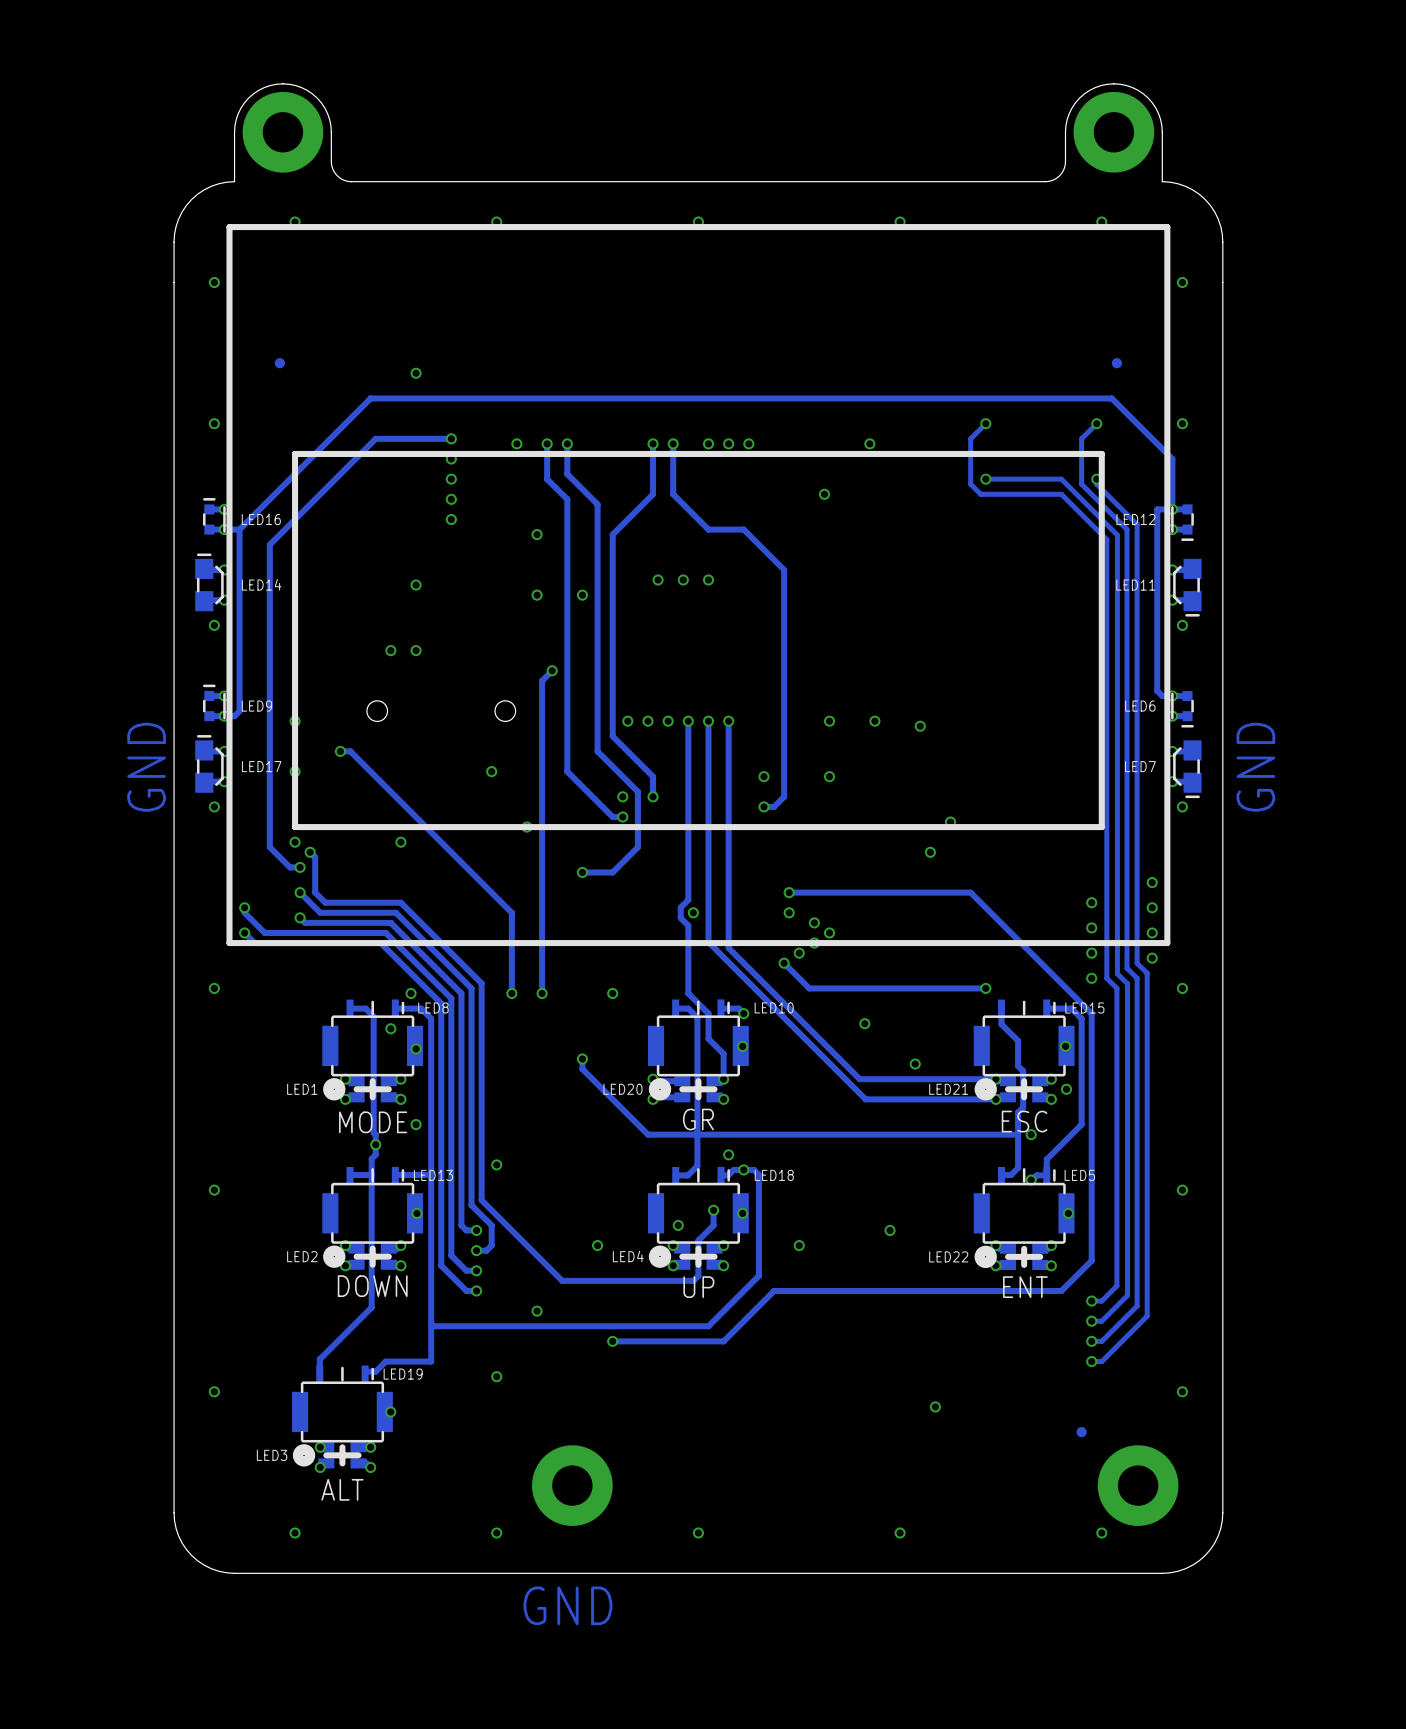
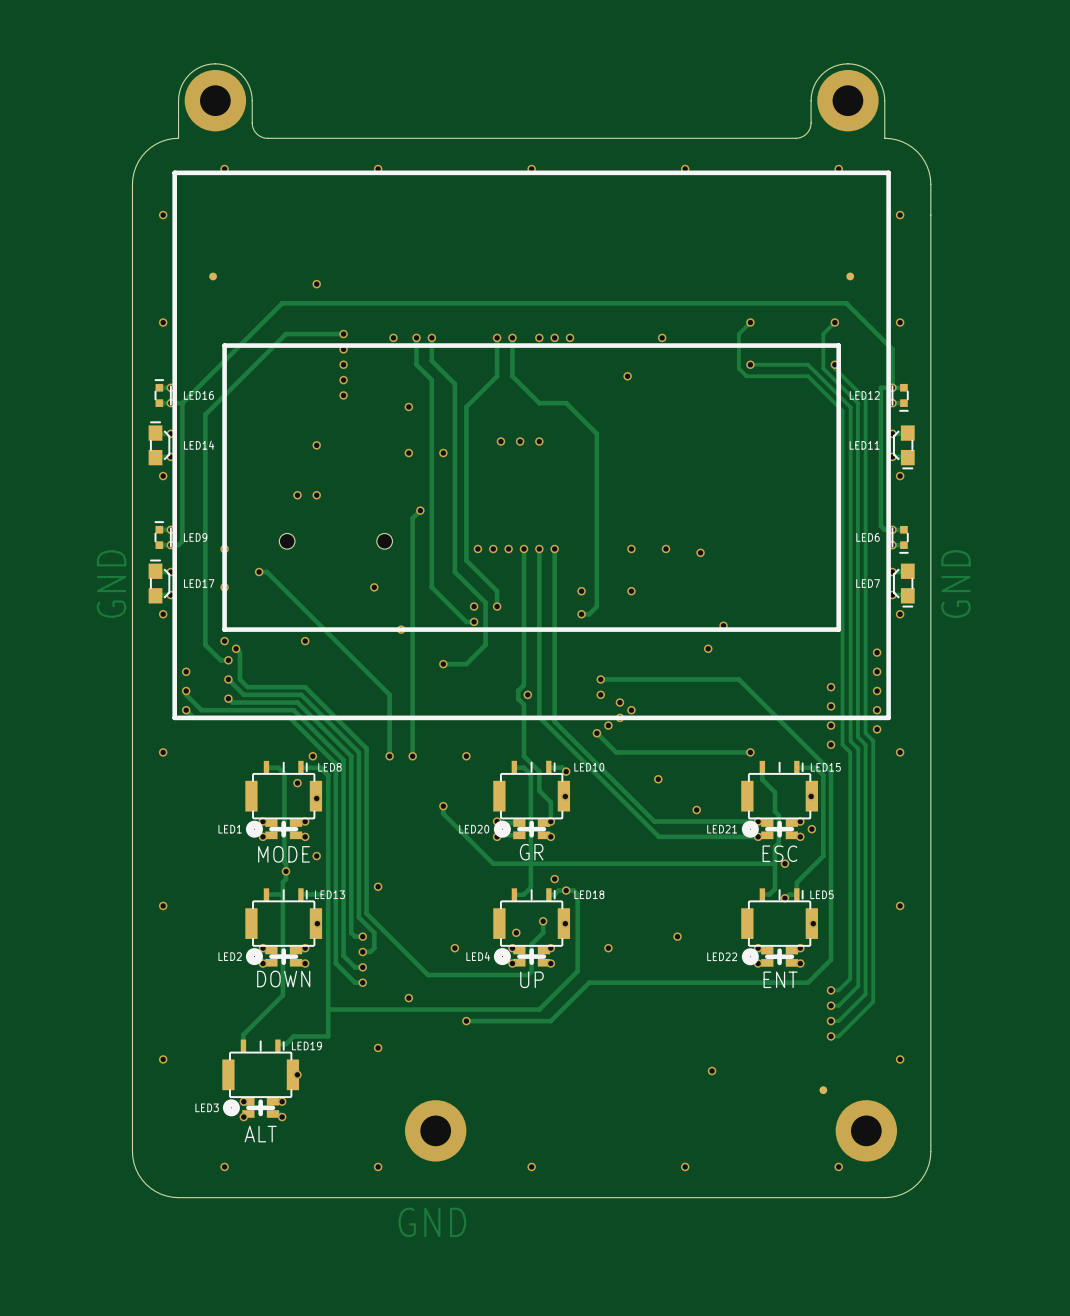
via: none -> (877, 652)
via: none -> (186, 671)

